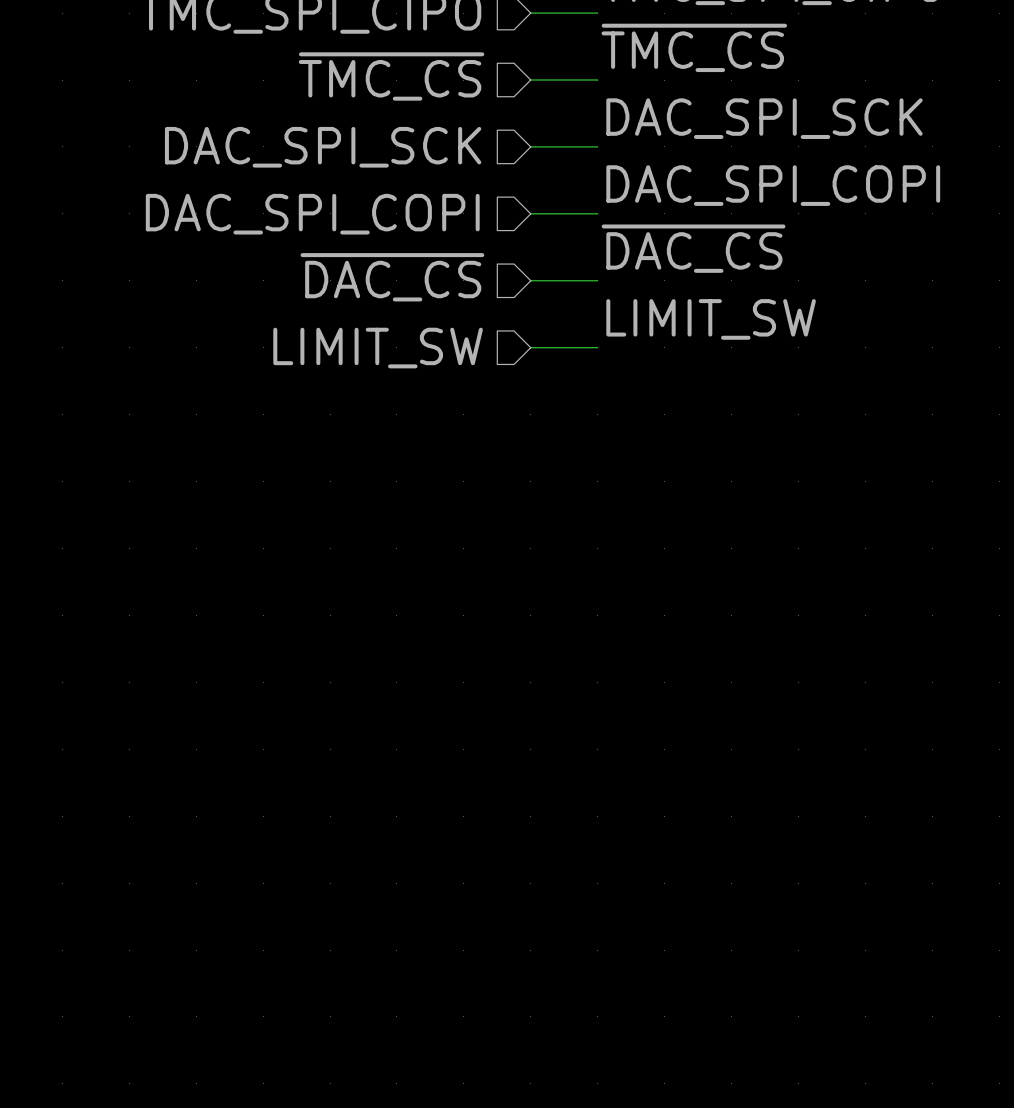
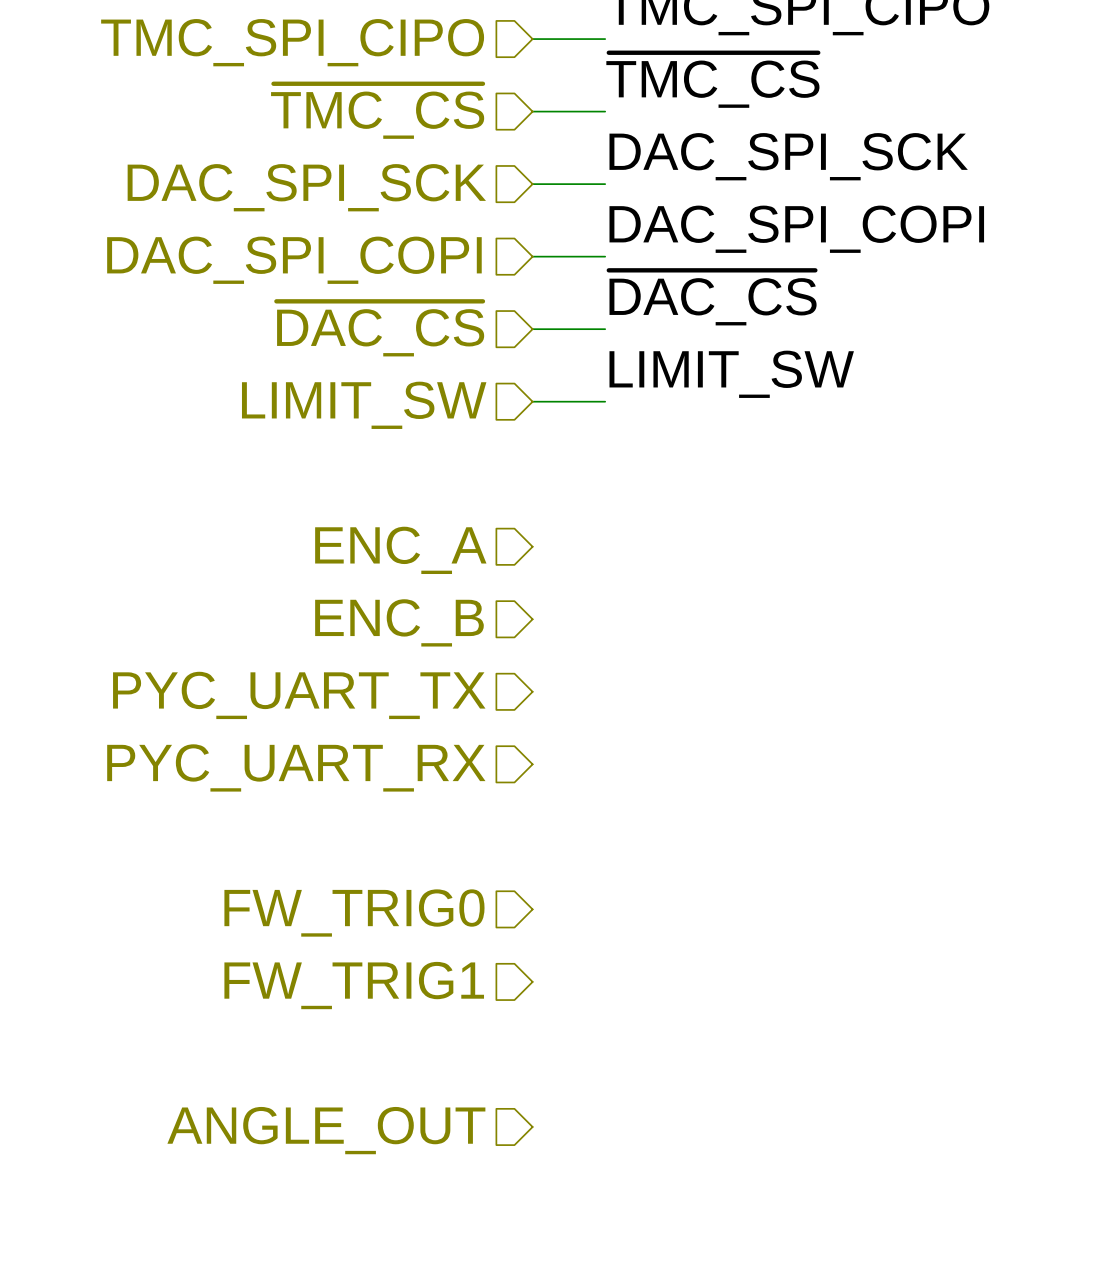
hierarchical label: none -> ENC_A (400, 550)
hierarchical label: none -> ENC_B (399, 622)
hierarchical label: none -> PYC_UART_TX (299, 695)
hierarchical label: none -> PYC_UART_RX (296, 767)
hierarchical label: none -> FW_TRIG0 (354, 913)
hierarchical label: none -> FW_TRIG1 (354, 985)
hierarchical label: none -> ANGLE_OUT (326, 1130)

